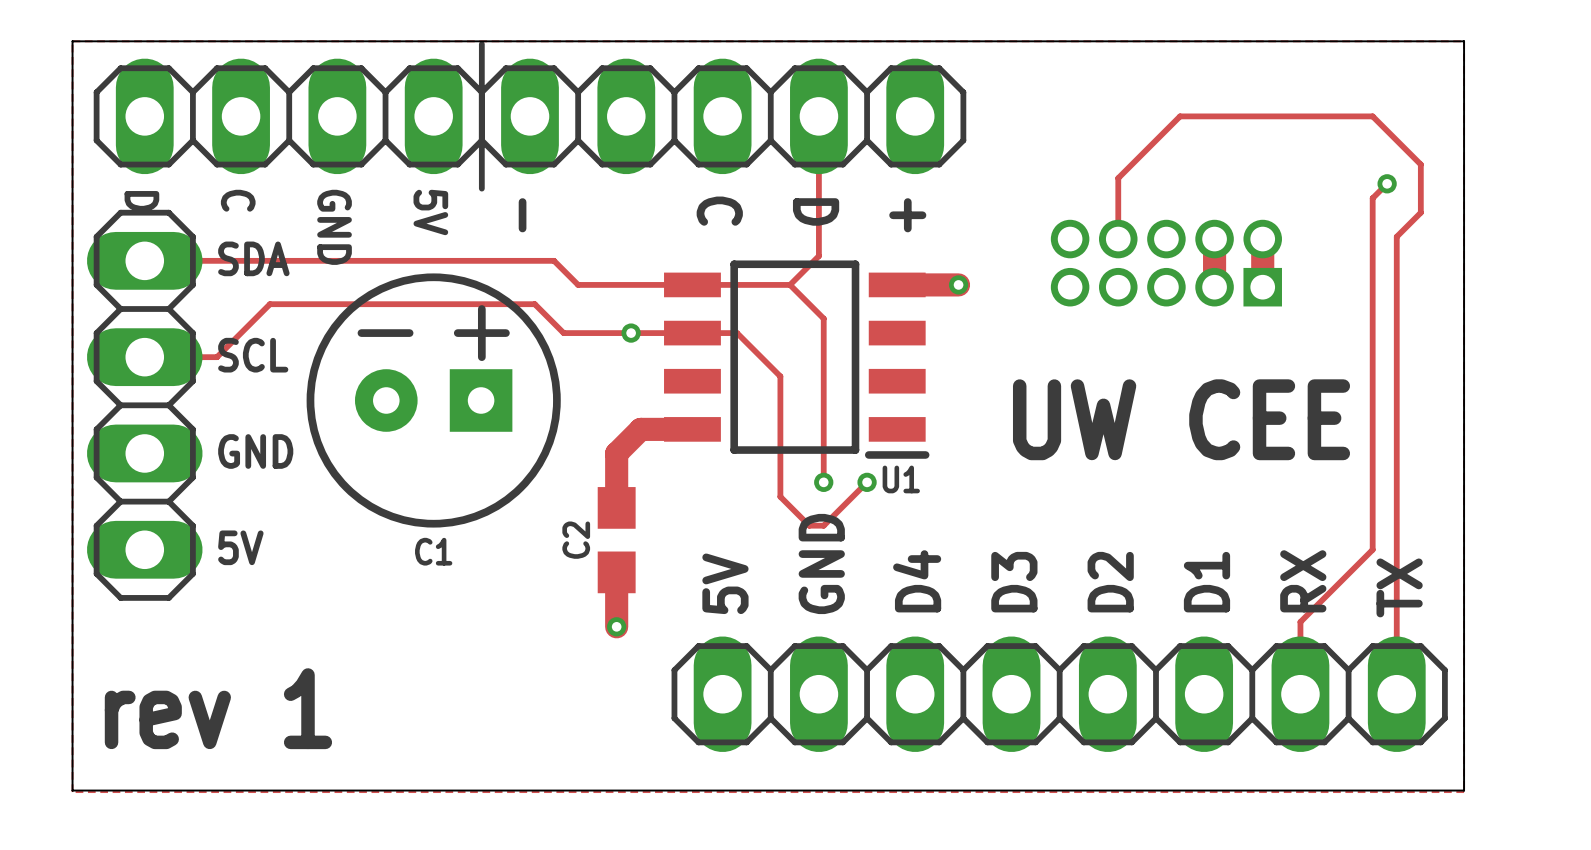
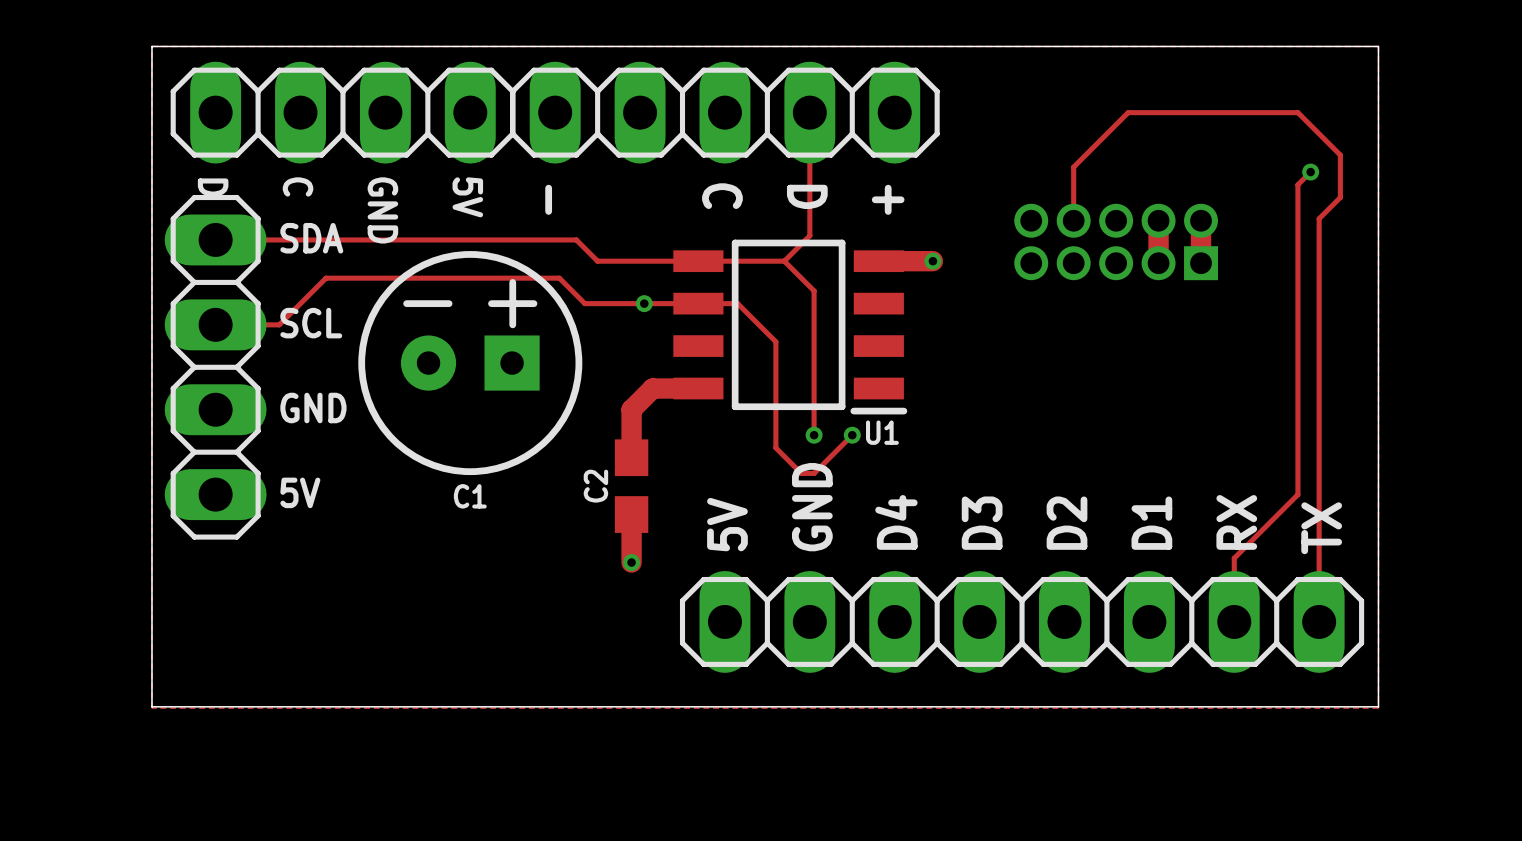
line: (481, 44) (481, 188) -> none
text: UW CEE (1181, 419) -> none
text: rev 1 (218, 708) -> none

